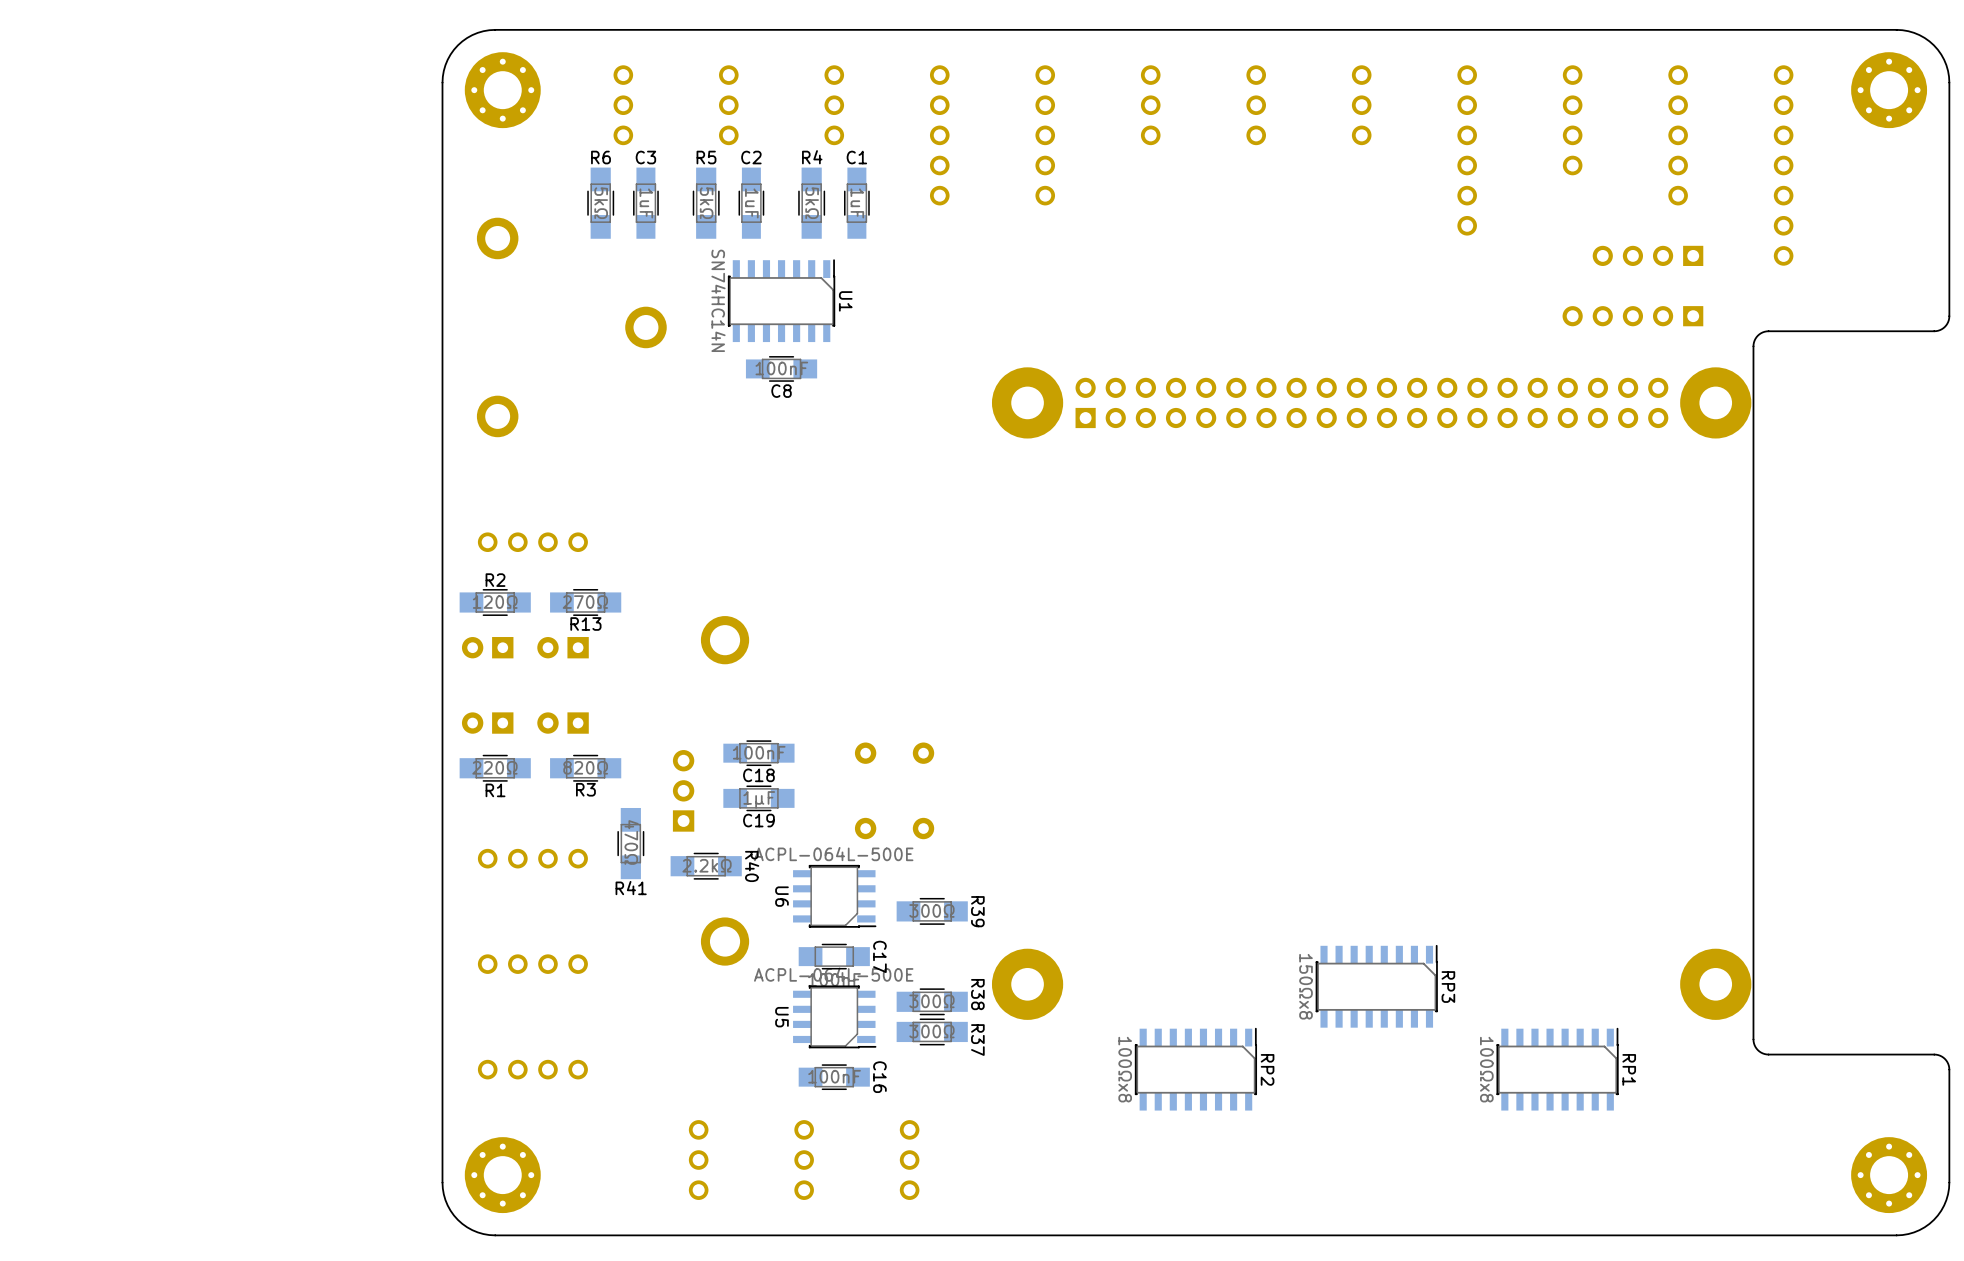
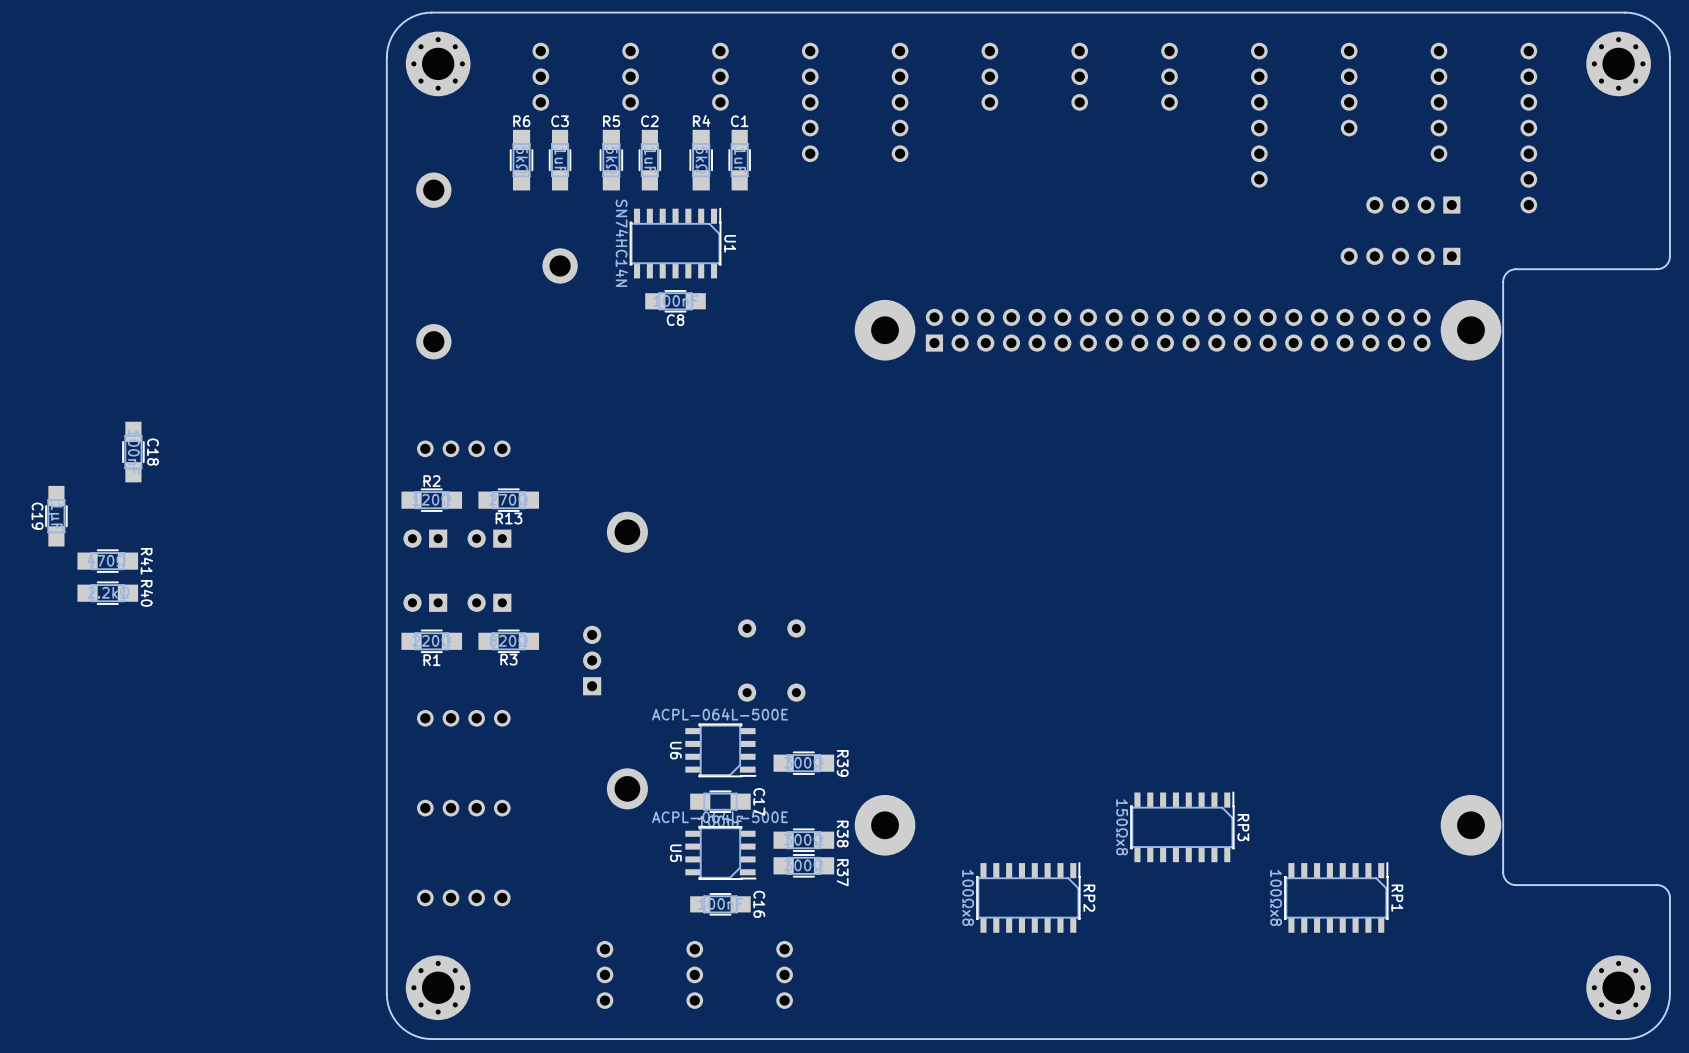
C18 rotation: 0° (758, 753) -> 90° clockwise (133, 452)
C18 position: (758, 753) -> (133, 452)
C18 name position: C18 (758, 775) -> C18 (153, 452)
C19 rotation: 0° (758, 798) -> 90° clockwise (56, 516)
C19 position: (758, 798) -> (56, 516)
R41 rotation: 0° (630, 843) -> 90° clockwise (107, 561)
R41 position: (630, 843) -> (107, 561)
R40 position: (706, 866) -> (107, 593)
R41 name position: R41 (631, 888) -> R41 (146, 561)

